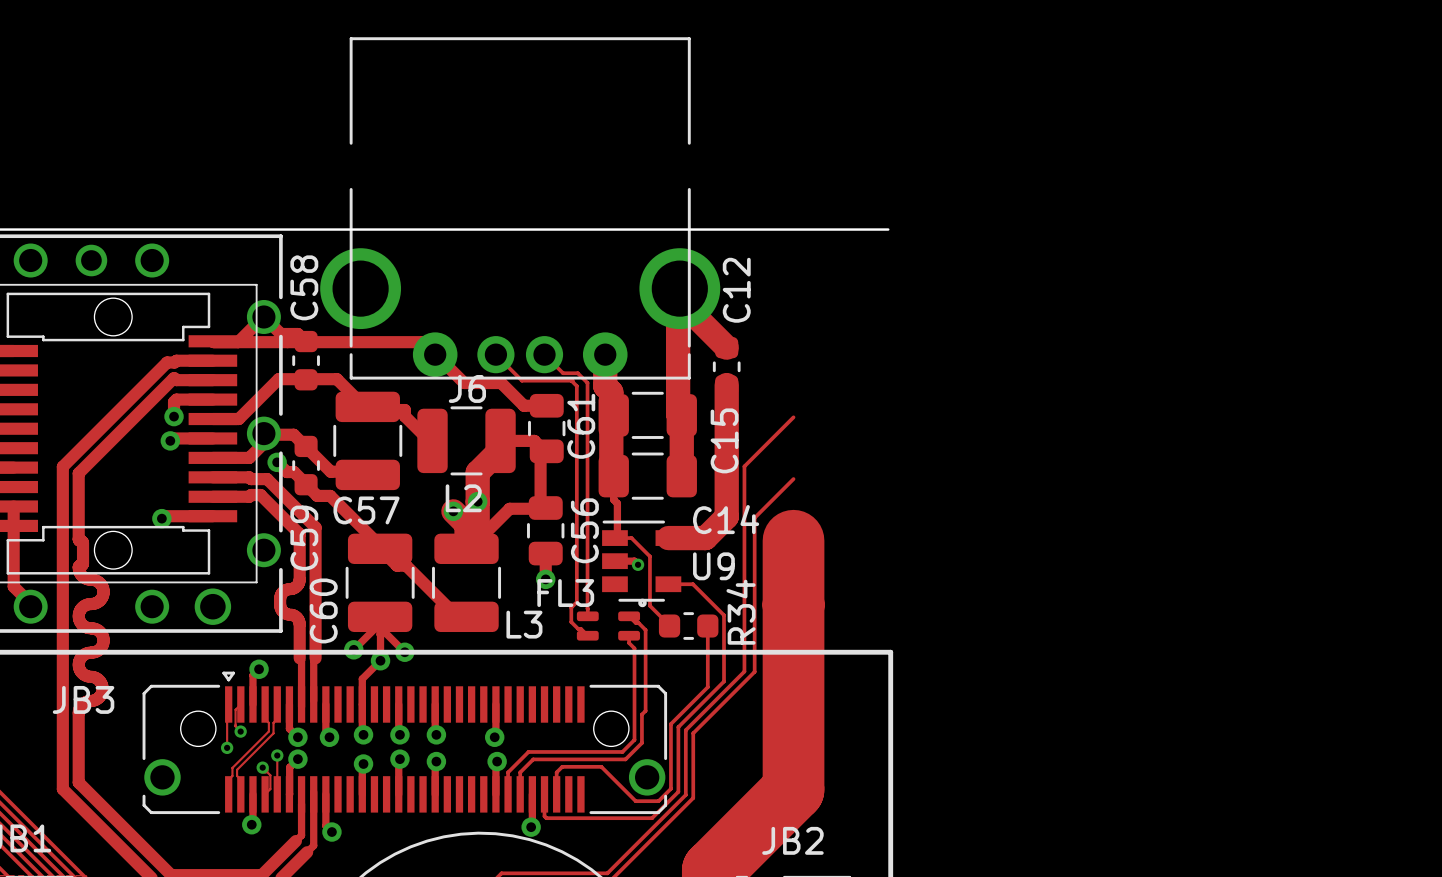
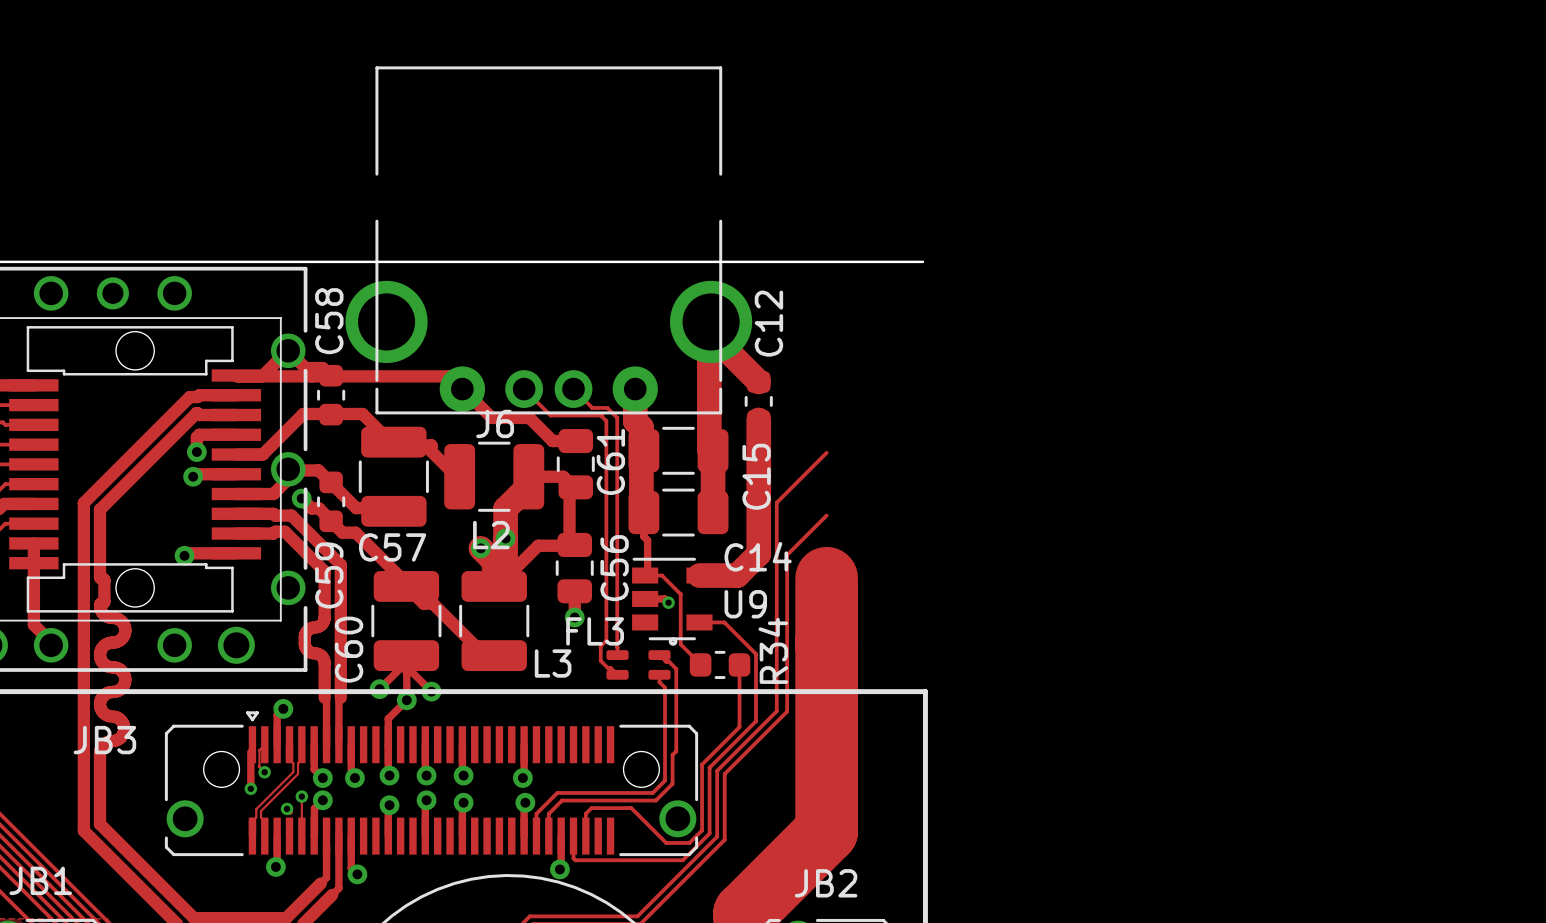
track width: thin (227, 711) (227, 747) -> thick (250, 751) (250, 788)
track: (262, 767) (270, 775) (270, 789) (265, 794) -> none

